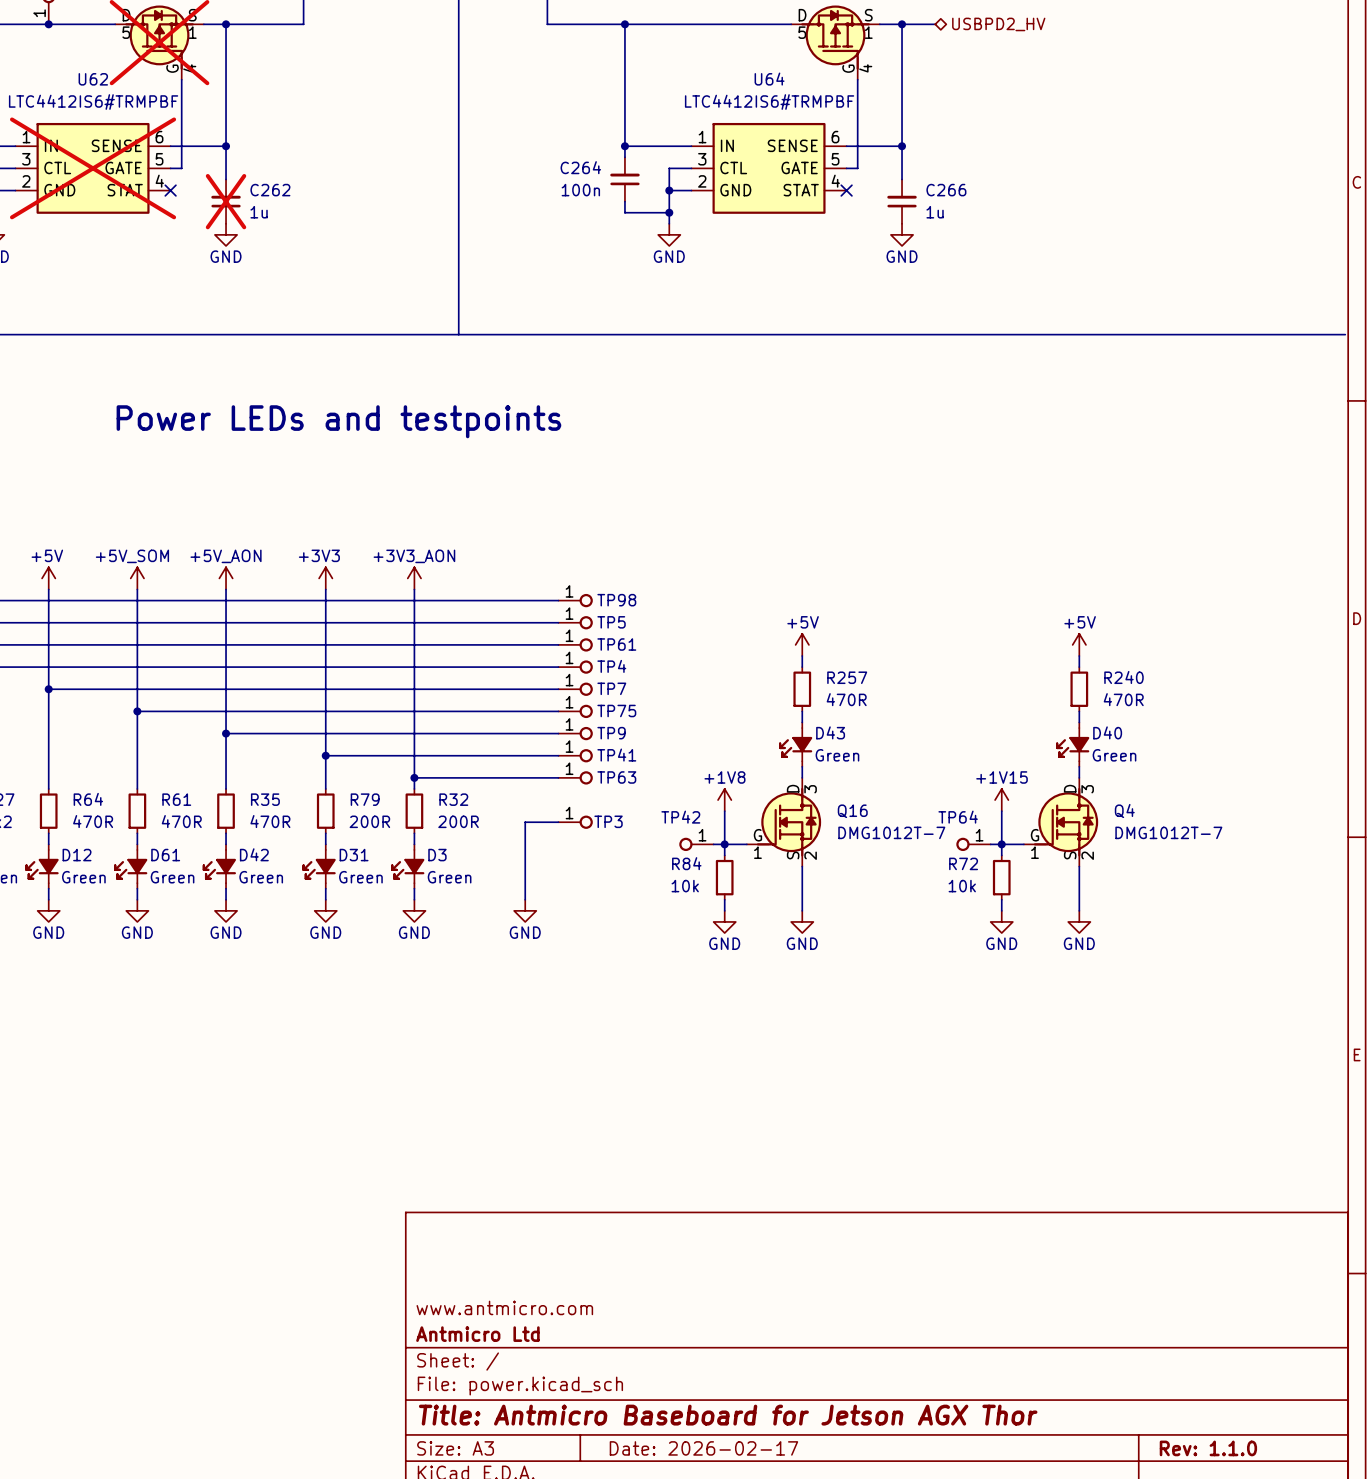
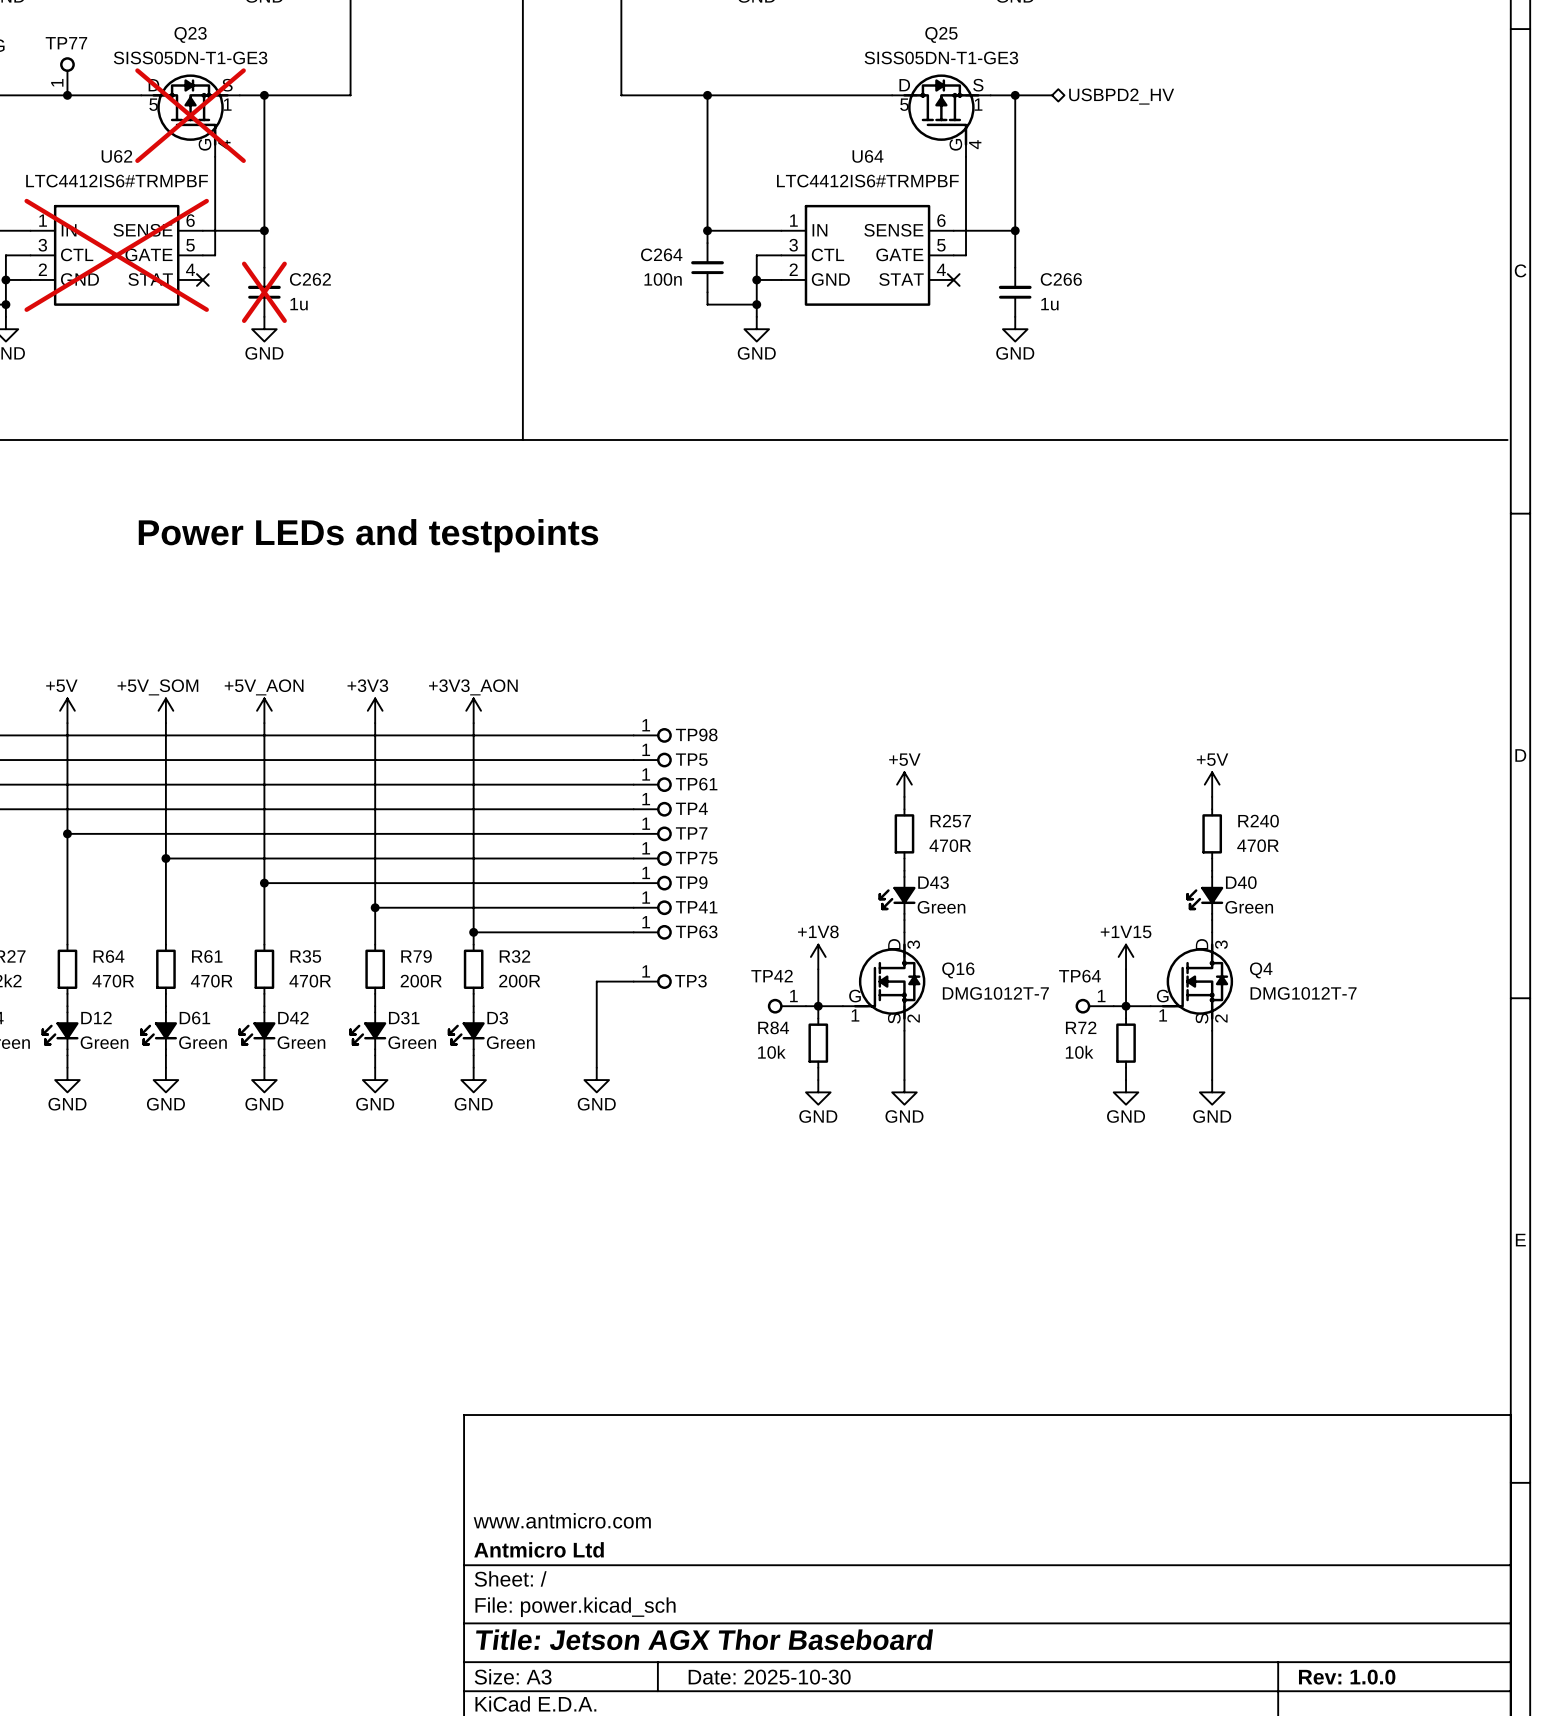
title block: Title: Antmicro Baseboard for Jetson AGX Thor (728, 1415) -> Title: Jetson AGX Thor Baseboard (704, 1639)
title block: Date: 2026-02-17 (703, 1448) -> Date: 2025-10-30 (769, 1677)
title block: Rev: 1.1.0 (1208, 1448) -> Rev: 1.0.0 (1347, 1677)

